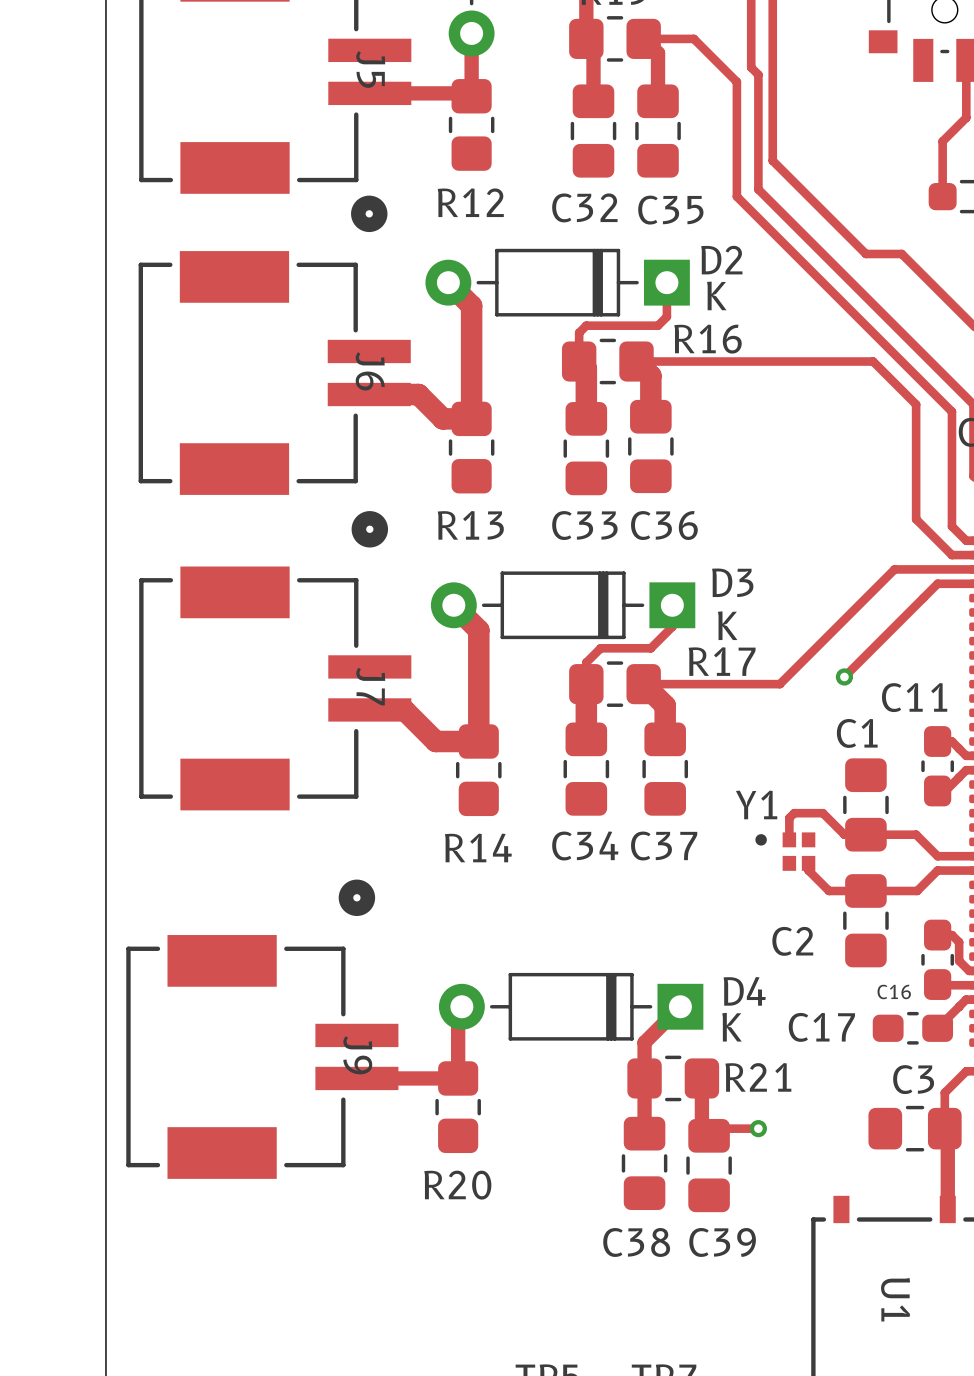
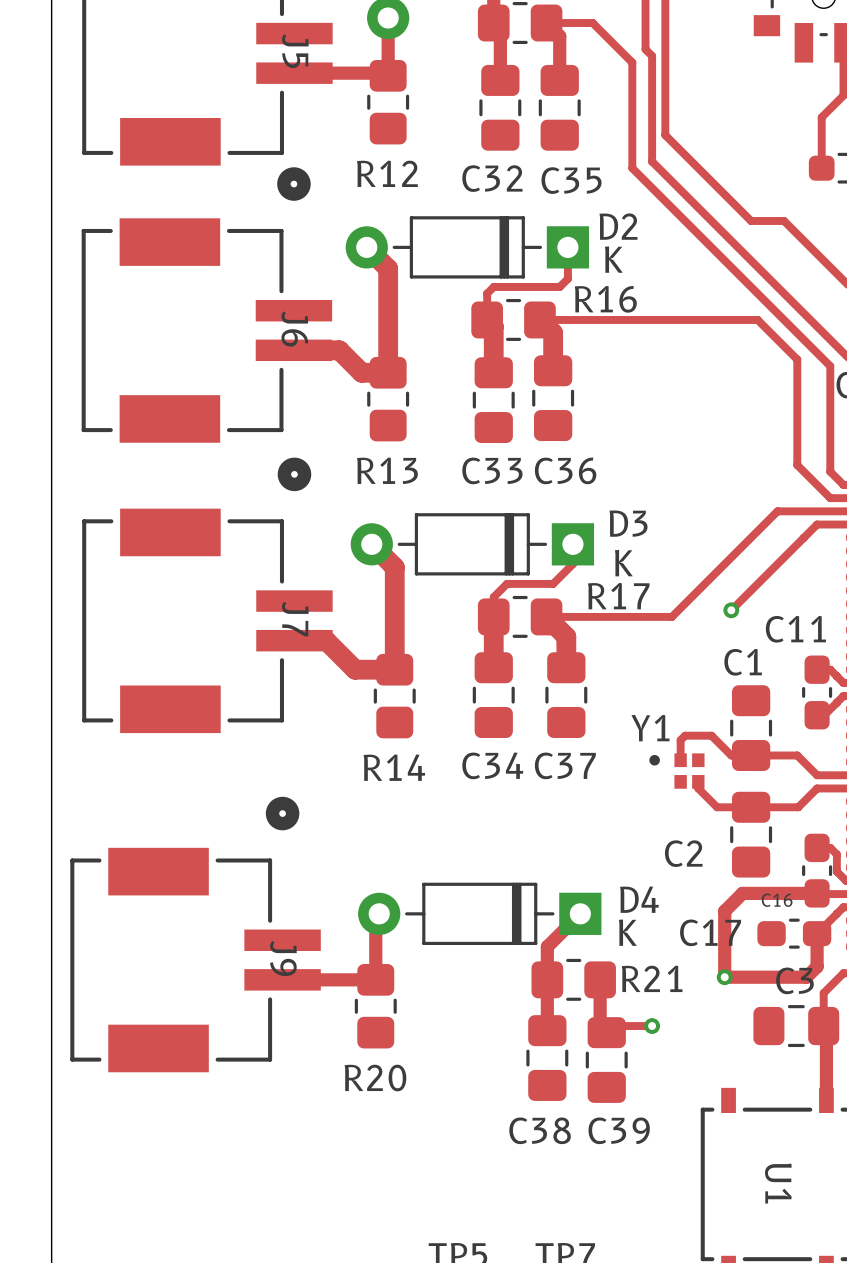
track: none -> (817, 893) (742, 893) (724, 911) (724, 977) (806, 977) (817, 966) (817, 933)
via: none -> (724, 977)

